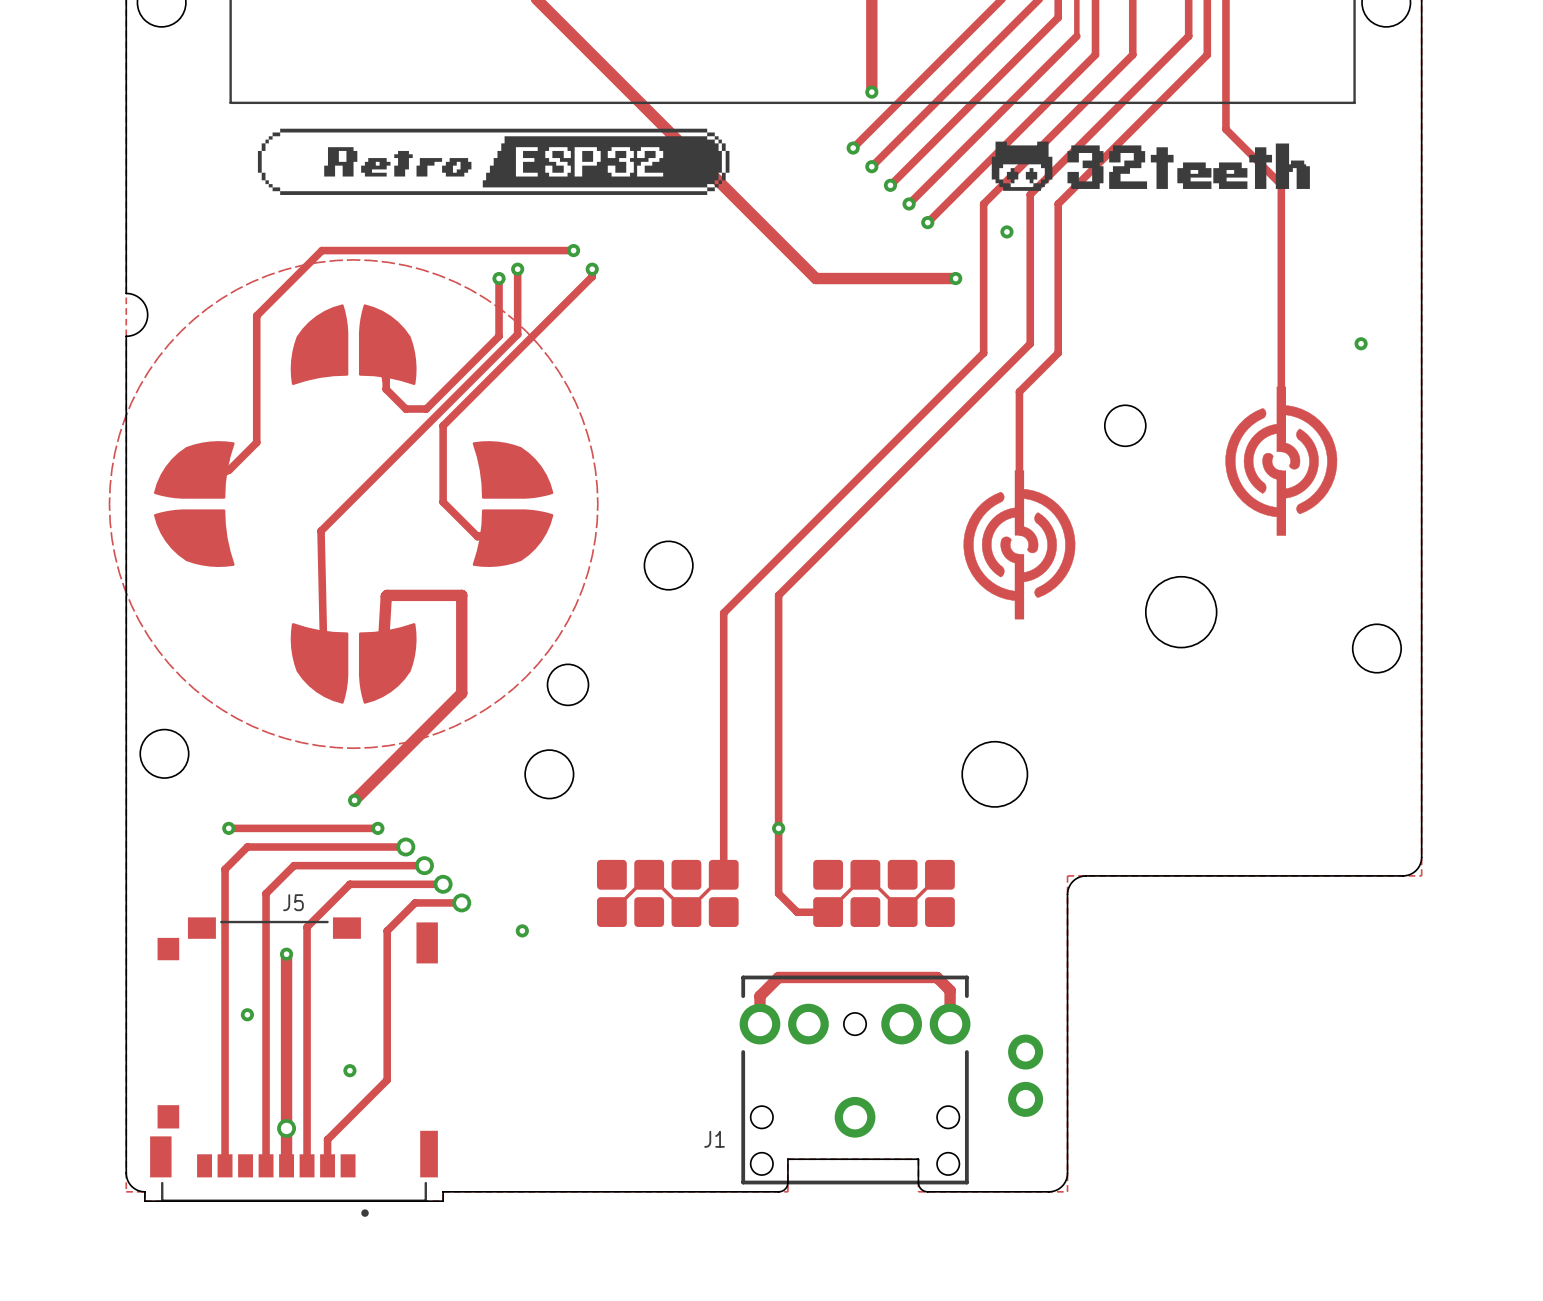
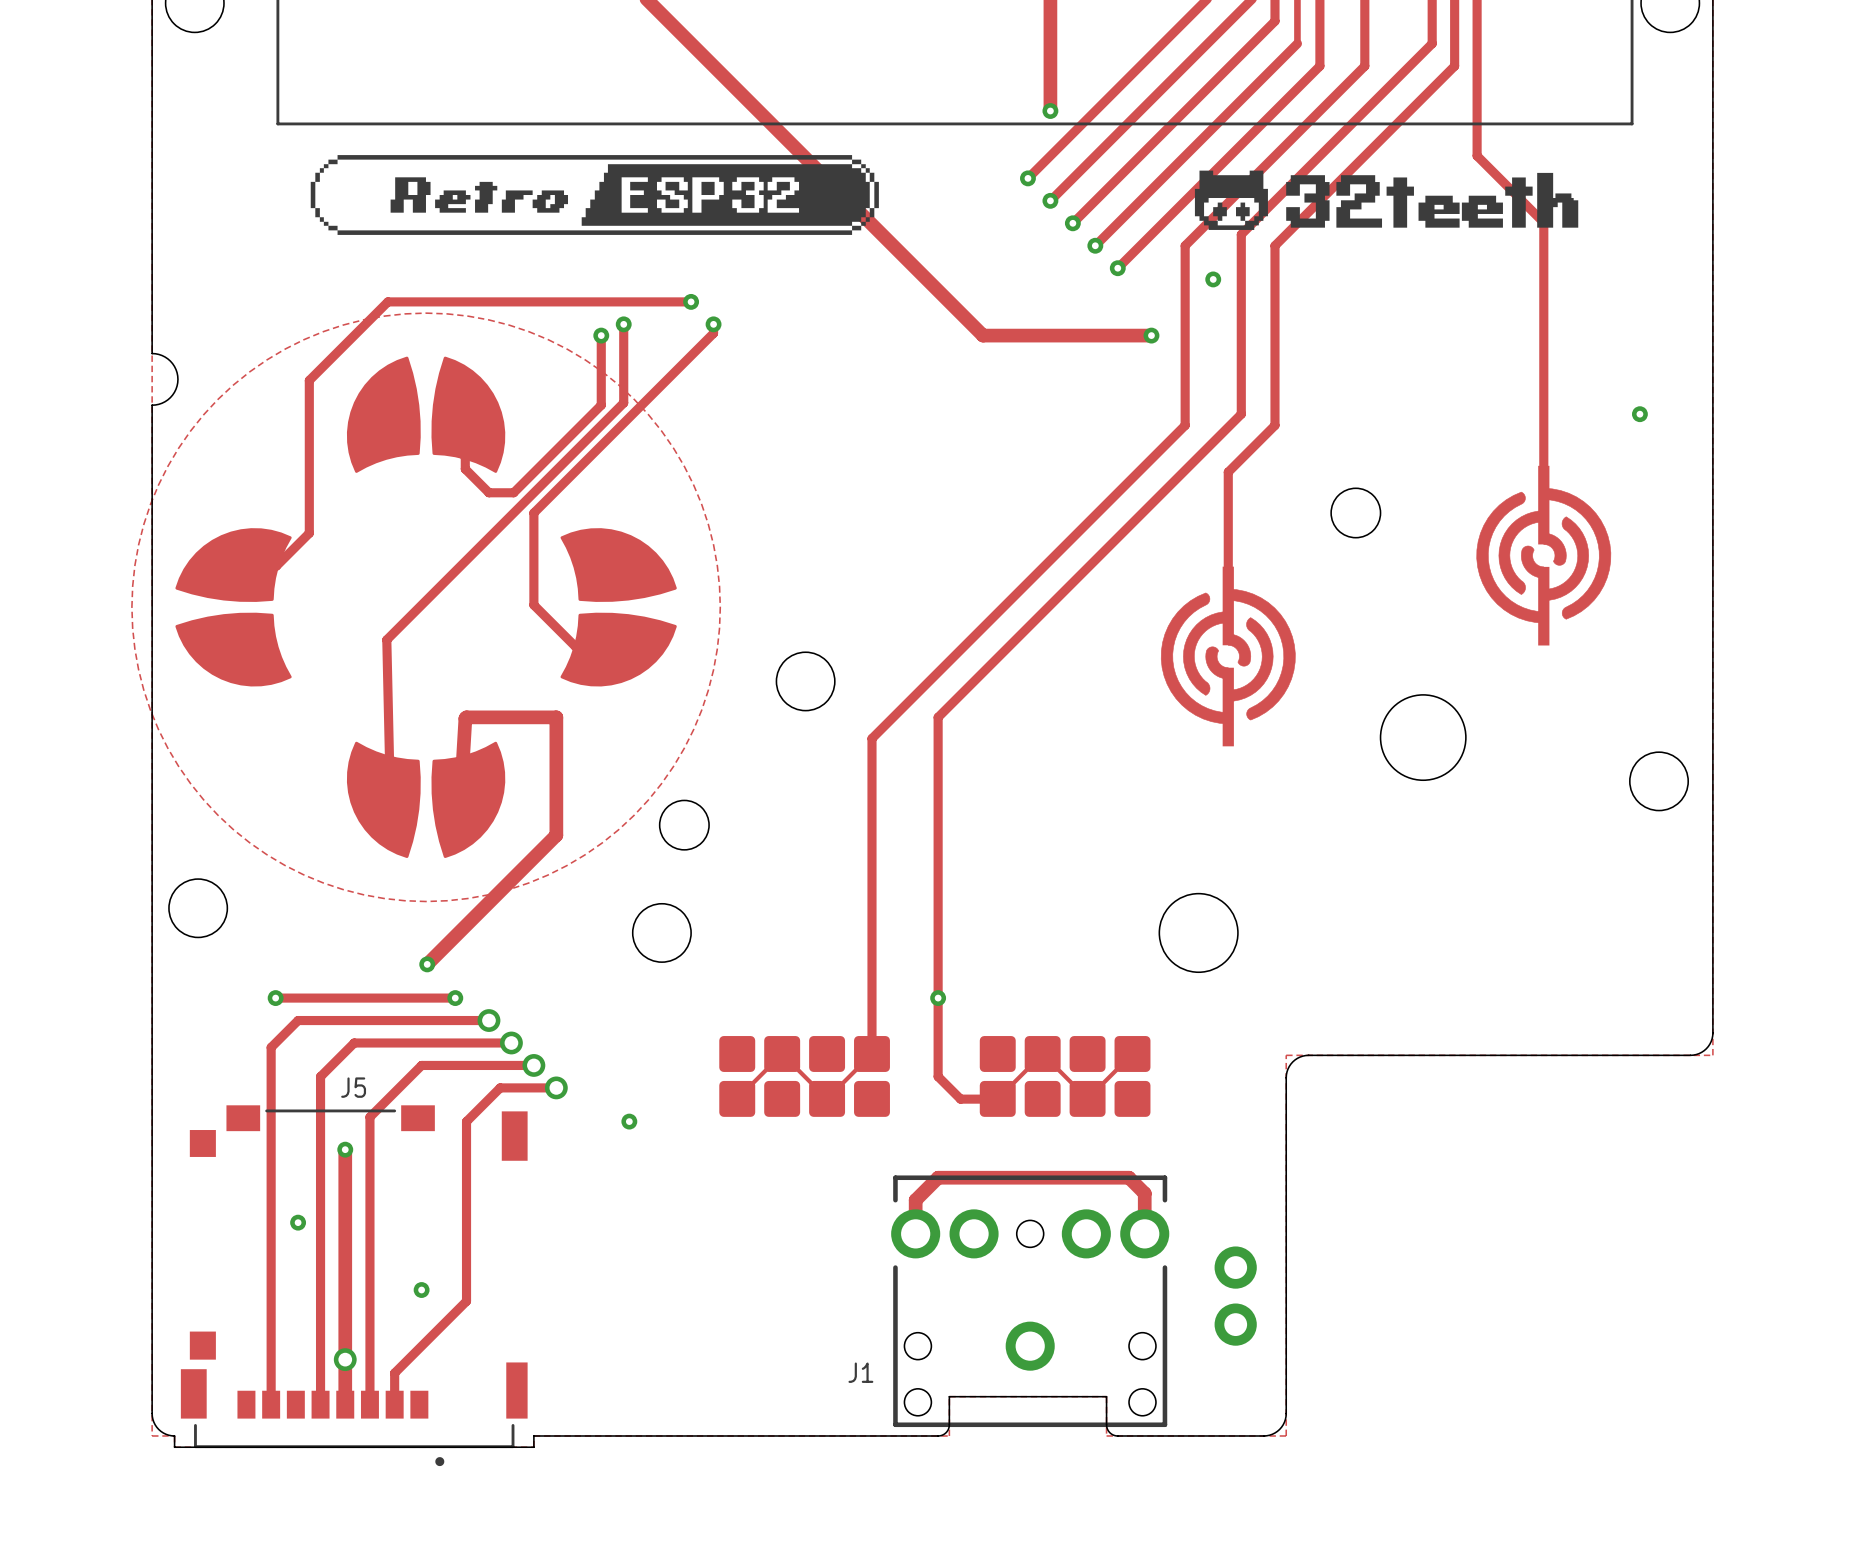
part footprint: [290, 304, 417, 386] -> [346, 356, 506, 473]
part footprint: [153, 441, 235, 568] -> [175, 528, 292, 687]
part footprint: [472, 441, 554, 568] -> [560, 528, 677, 687]
part footprint: [290, 623, 417, 704] -> [346, 741, 506, 859]

